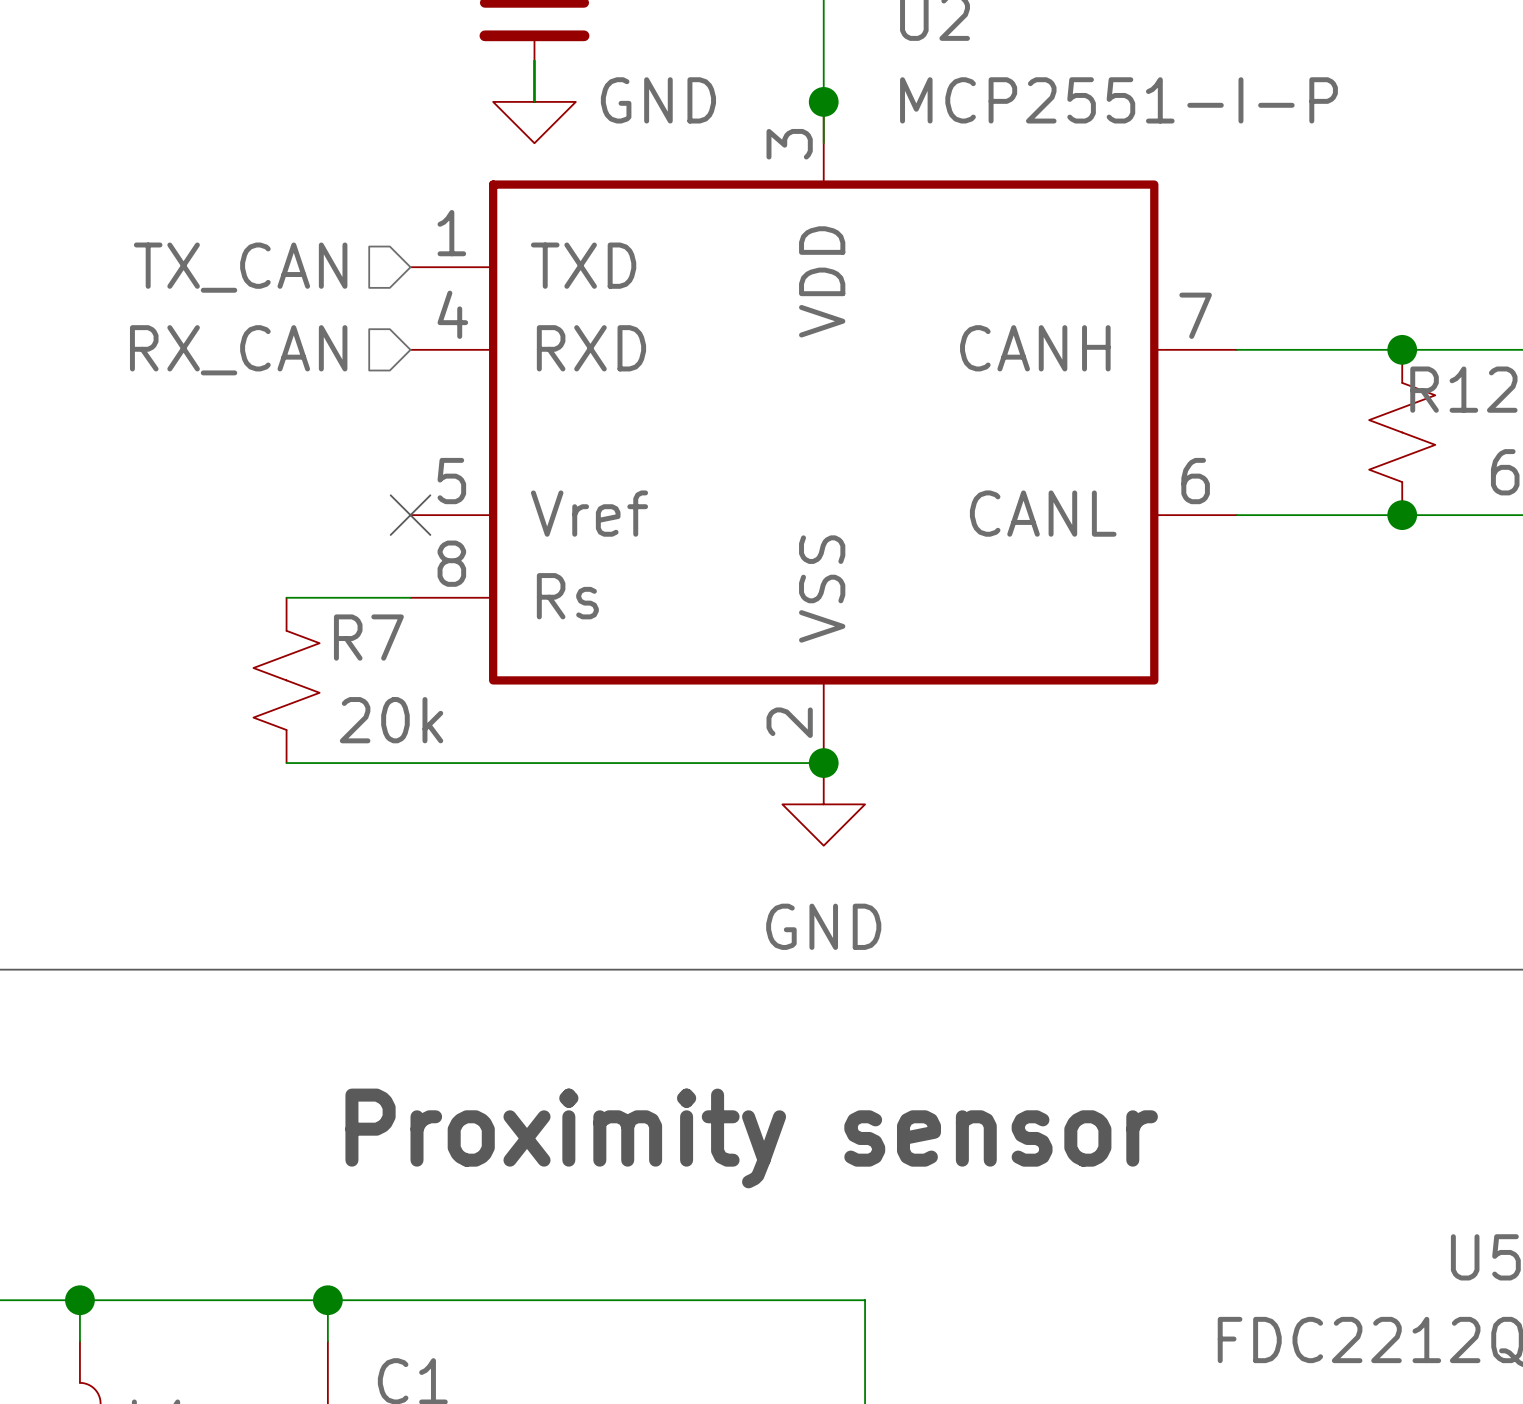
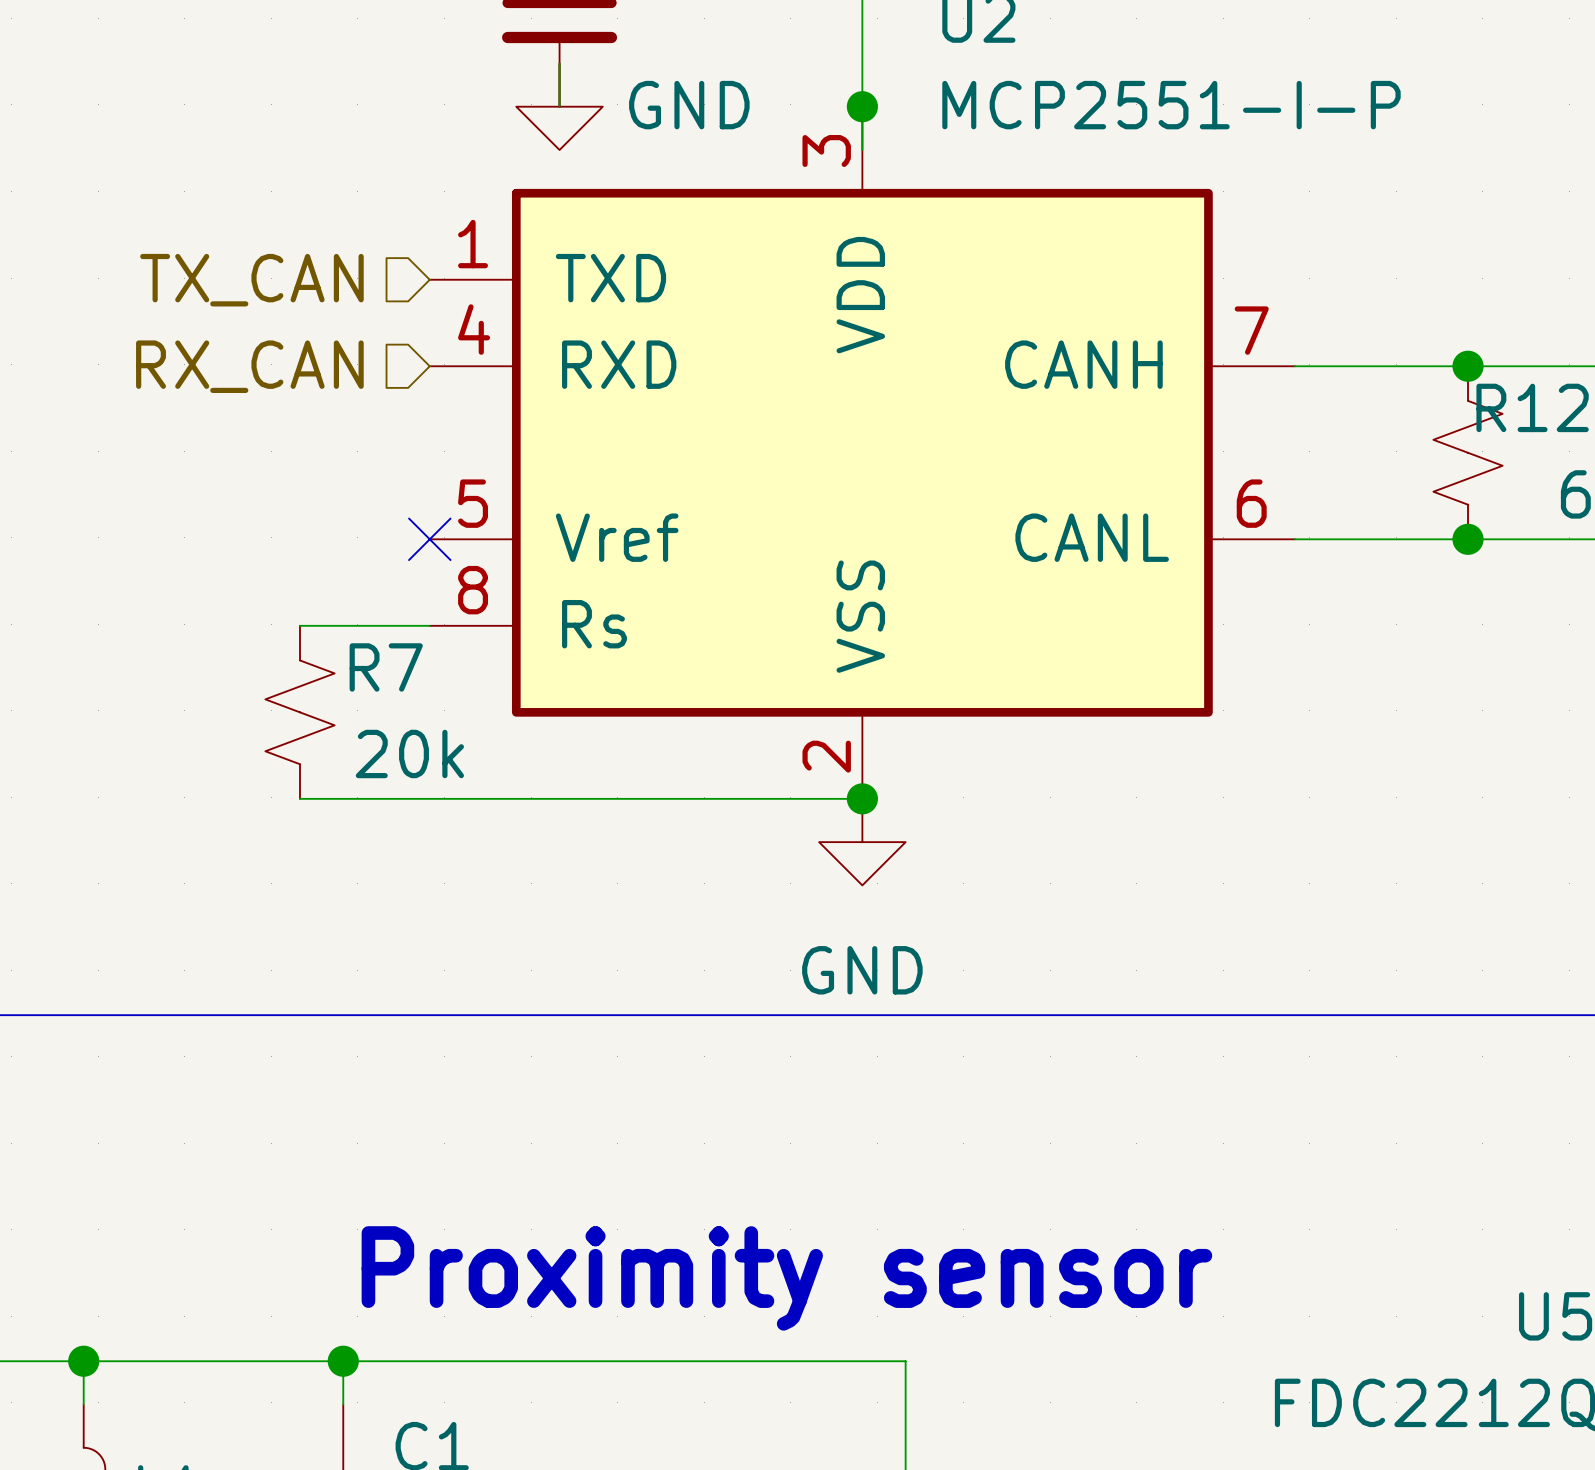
text position: Proximity sensor (751, 1138) -> Proximity sensor (786, 1278)

